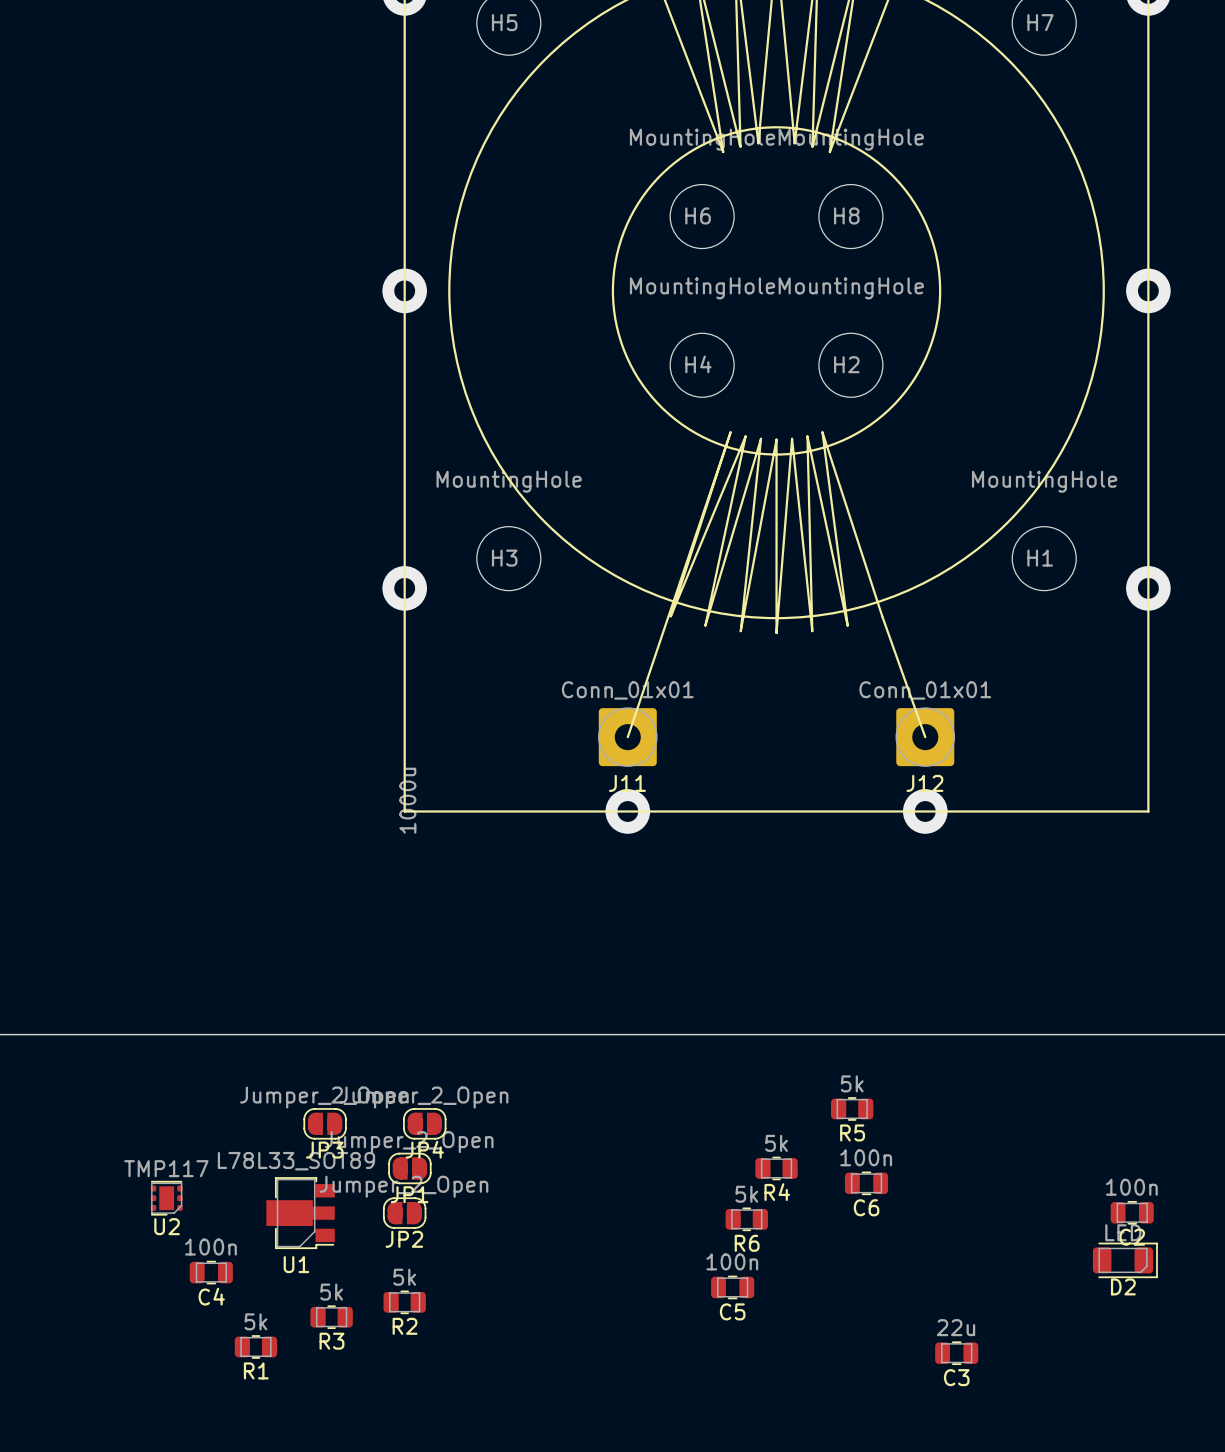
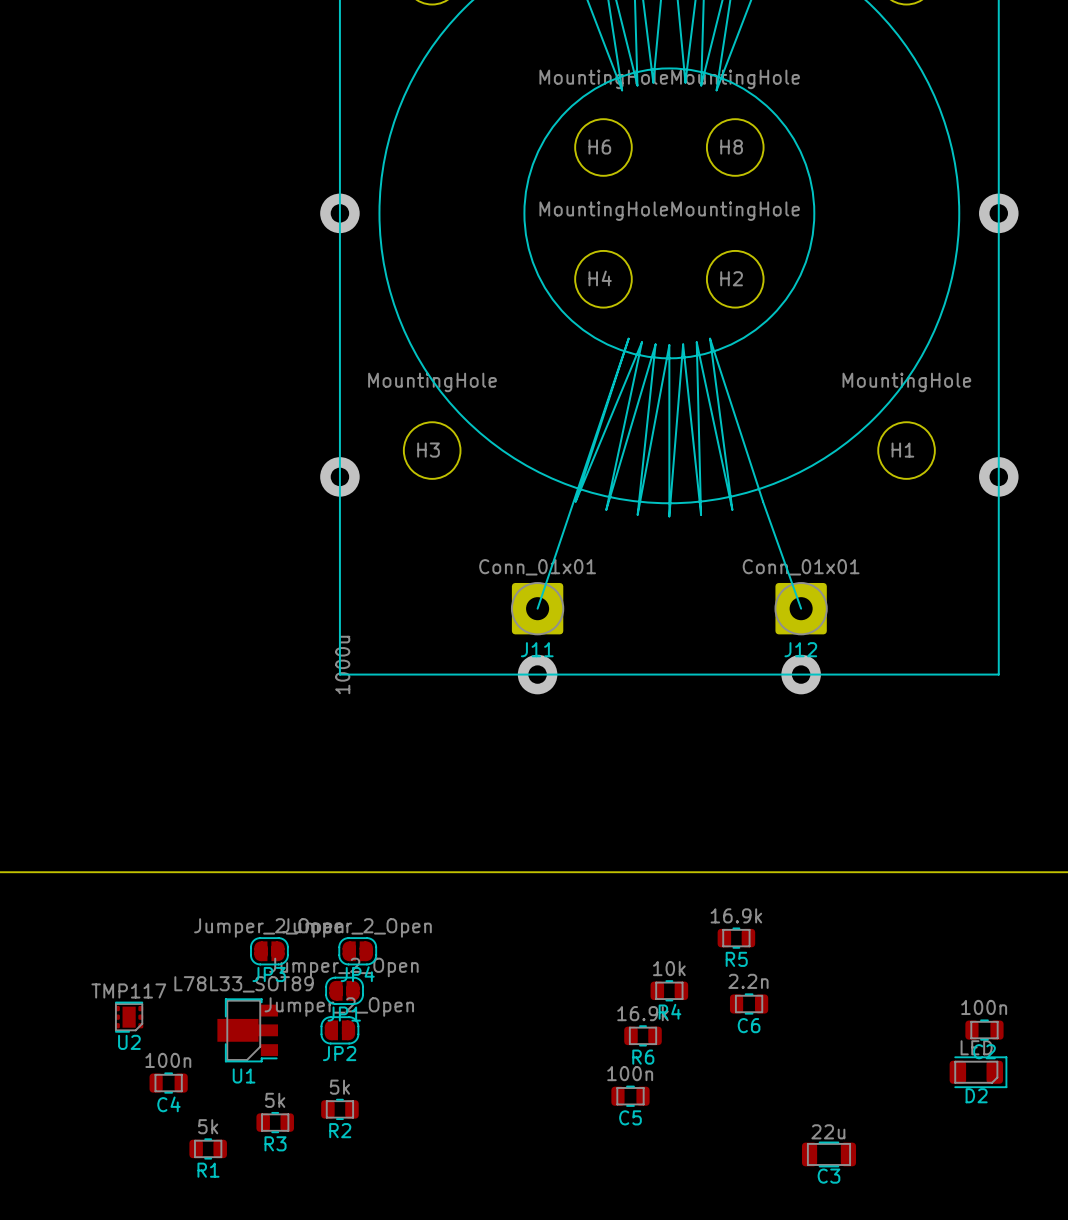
R5 value: 5k (852, 1083) -> 16.9k (736, 915)
R4 value: 5k (776, 1143) -> 10k (669, 968)
C6 value: 100n (866, 1157) -> 2.2n (748, 981)
R6 value: 5k (746, 1194) -> 16.9k (643, 1013)
C3 footprint: [935, 1341, 979, 1366] -> [801, 1141, 857, 1168]

